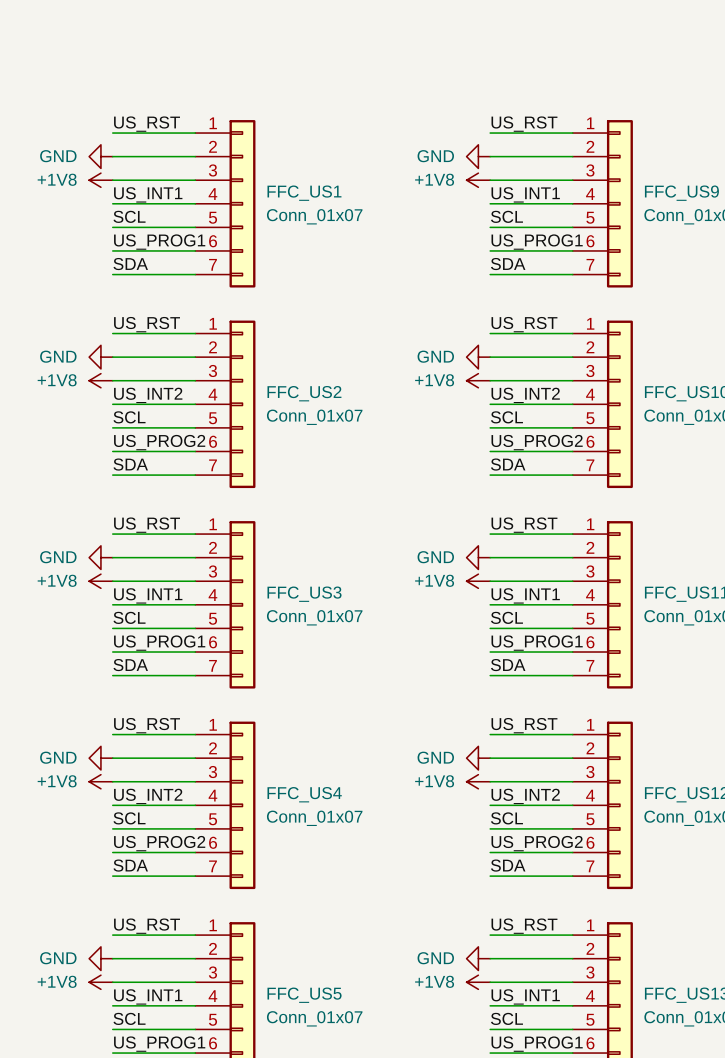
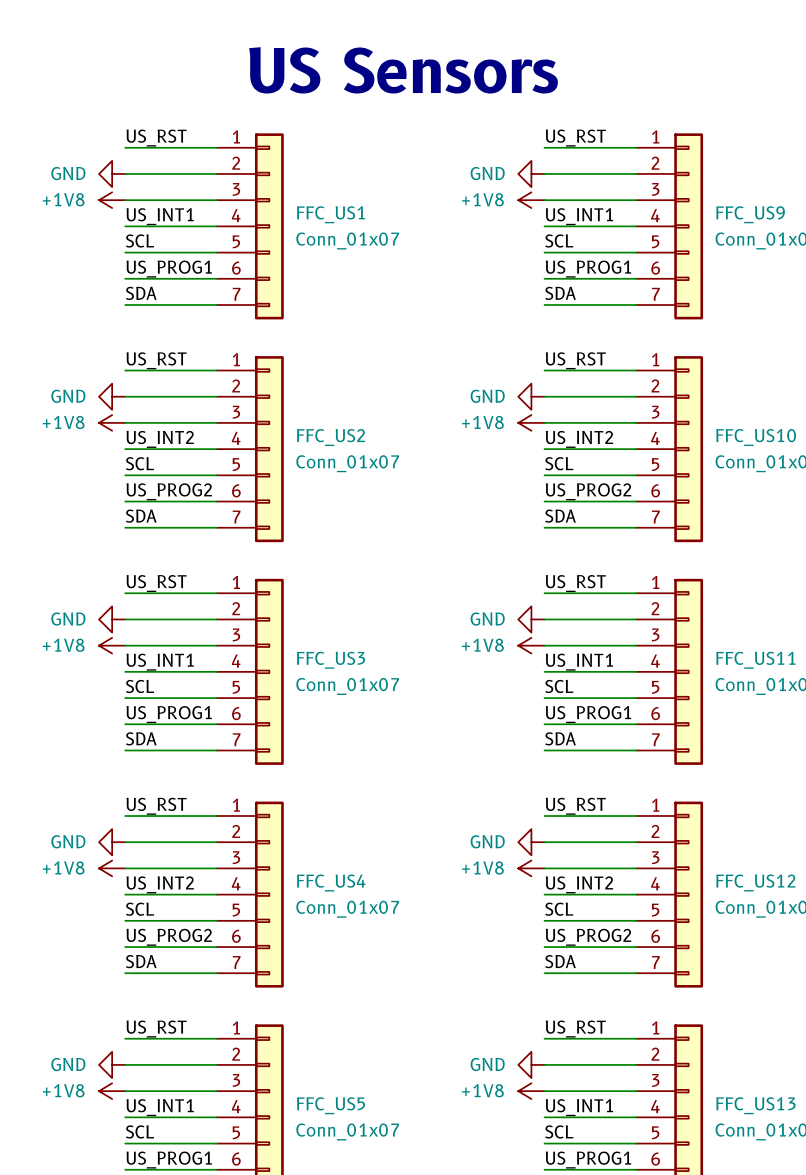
text: none -> US Sensors (403, 70)

